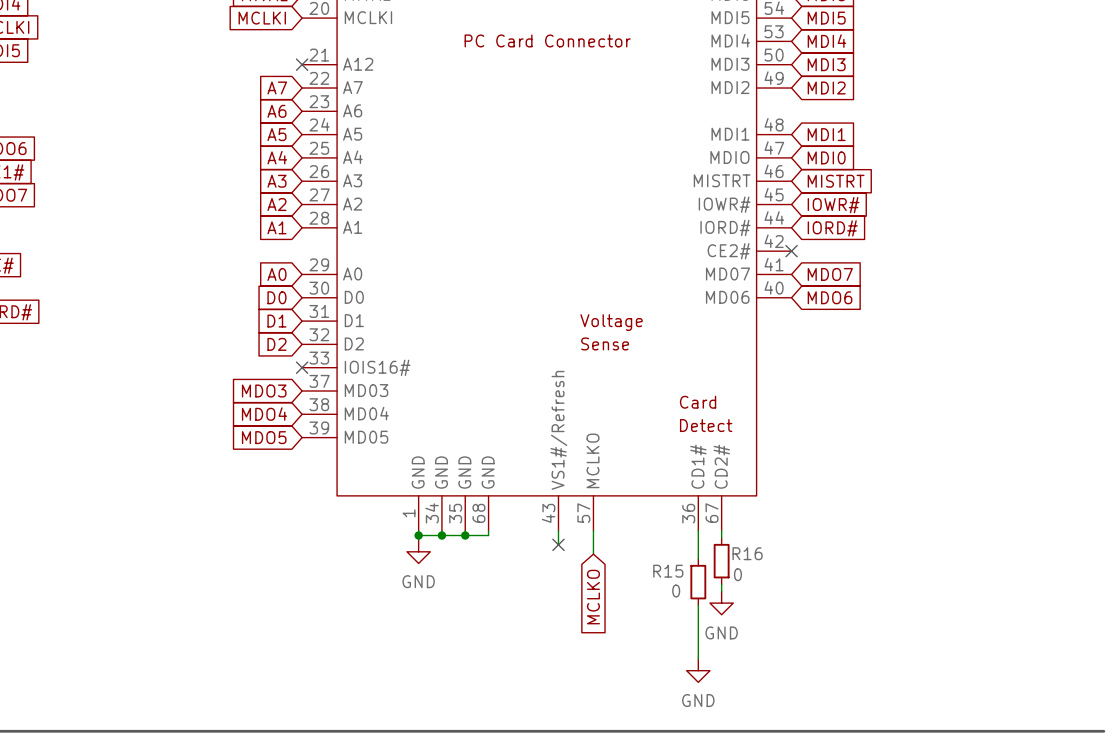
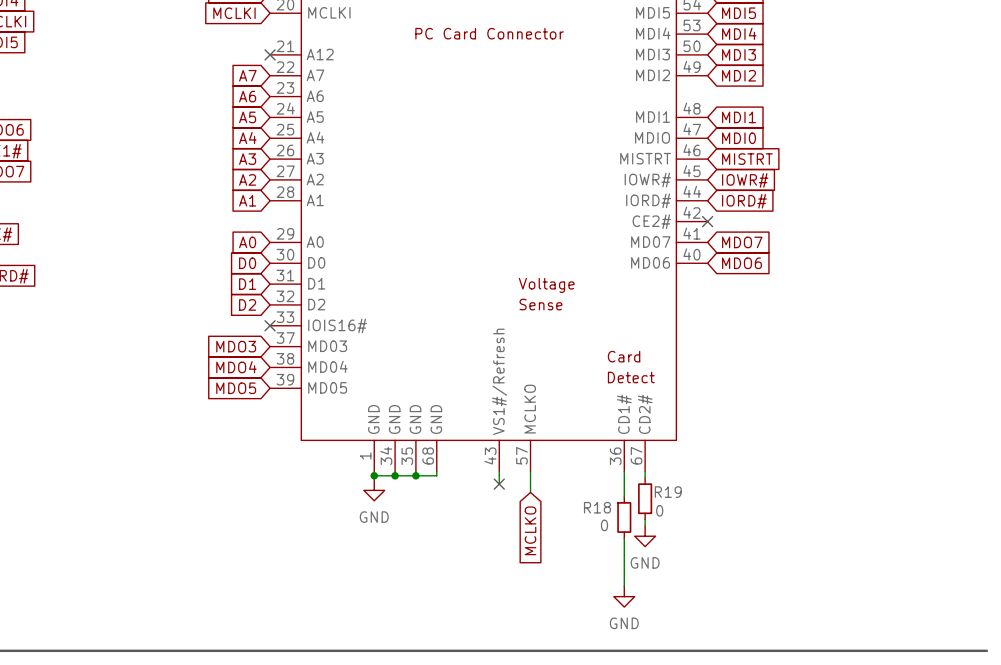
R16 name: R16 (747, 553) -> R19 (668, 492)
R15 name: R15 (668, 571) -> R18 (597, 507)

